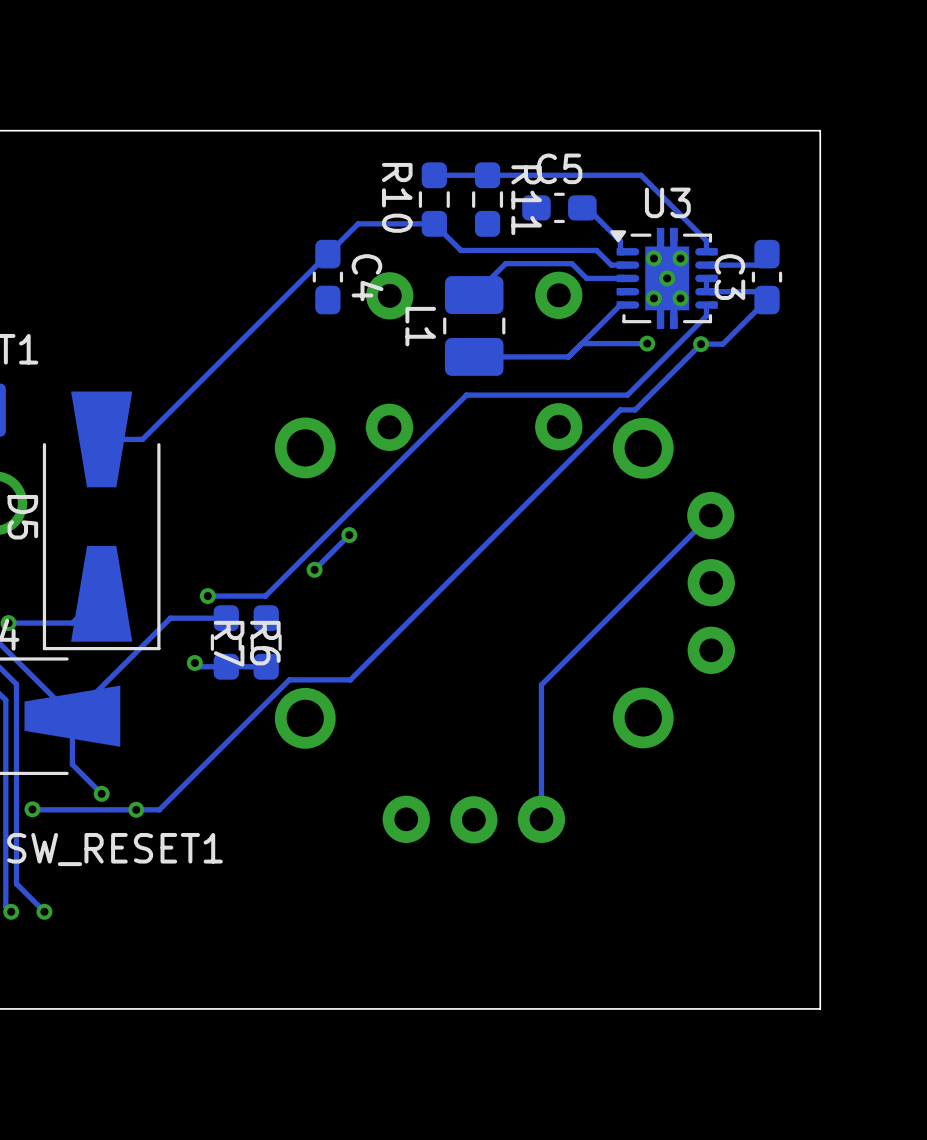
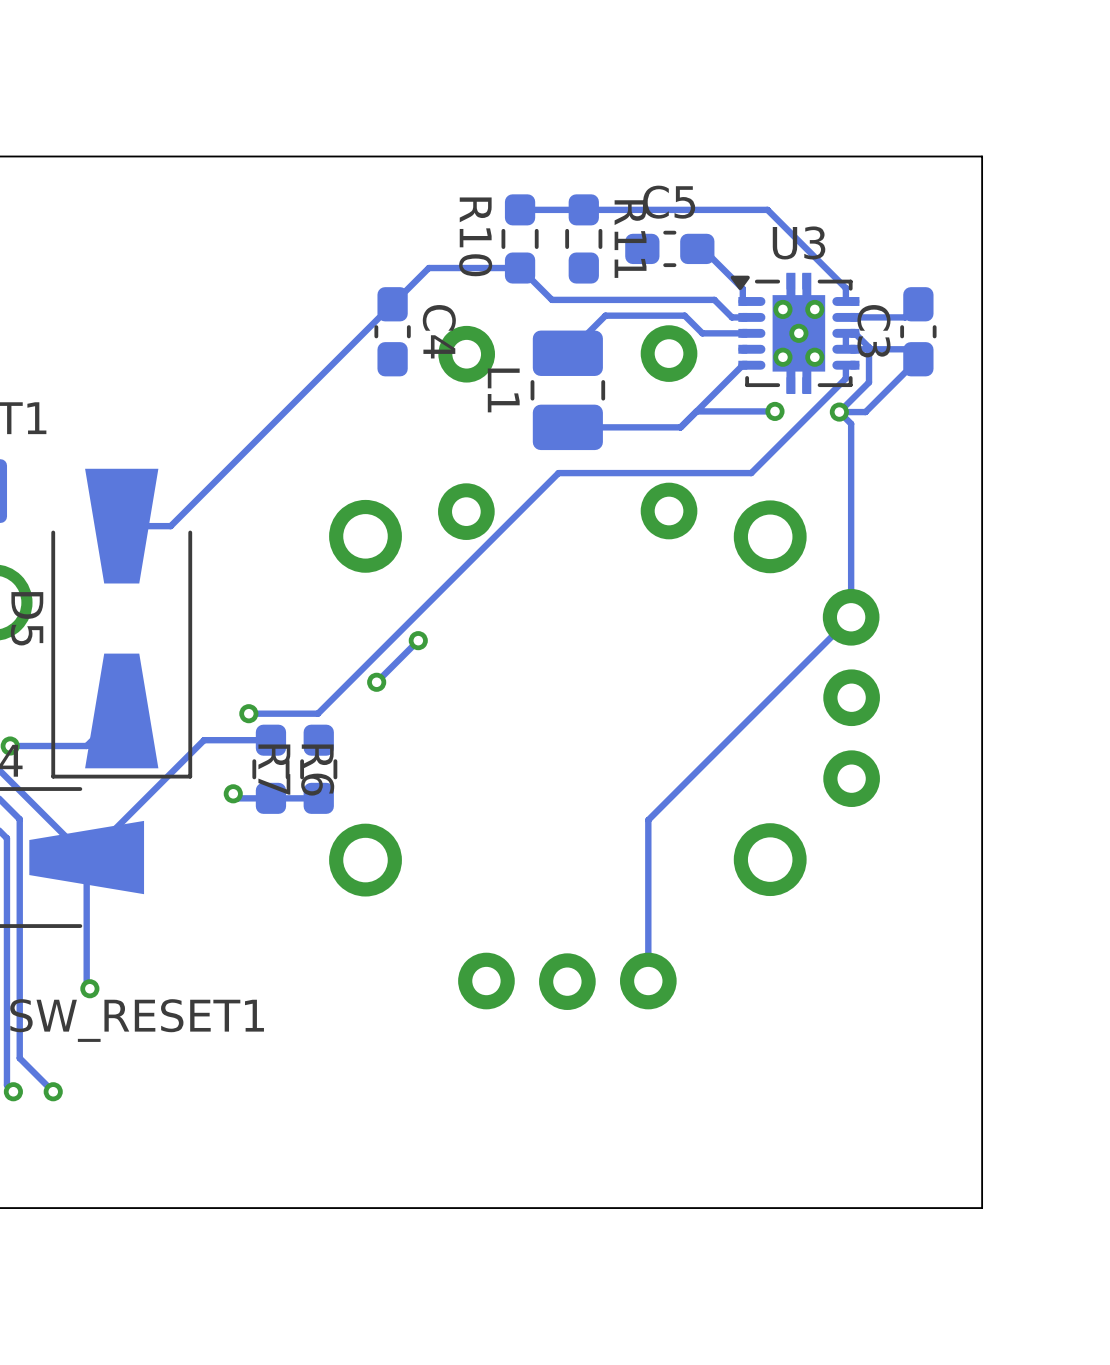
track: none -> (854, 333) (869, 347) (869, 382) (839, 412) (851, 423) (851, 617)
track: (701, 344) (635, 409) (620, 409) (350, 679) (289, 679) (159, 809) (32, 809) -> none
track: (72, 764) (101, 793) -> (86, 915) (86, 985) (89, 988)
via: (101, 793) -> none
via: (32, 809) -> none
via: (136, 809) -> none
via: none -> (89, 988)

